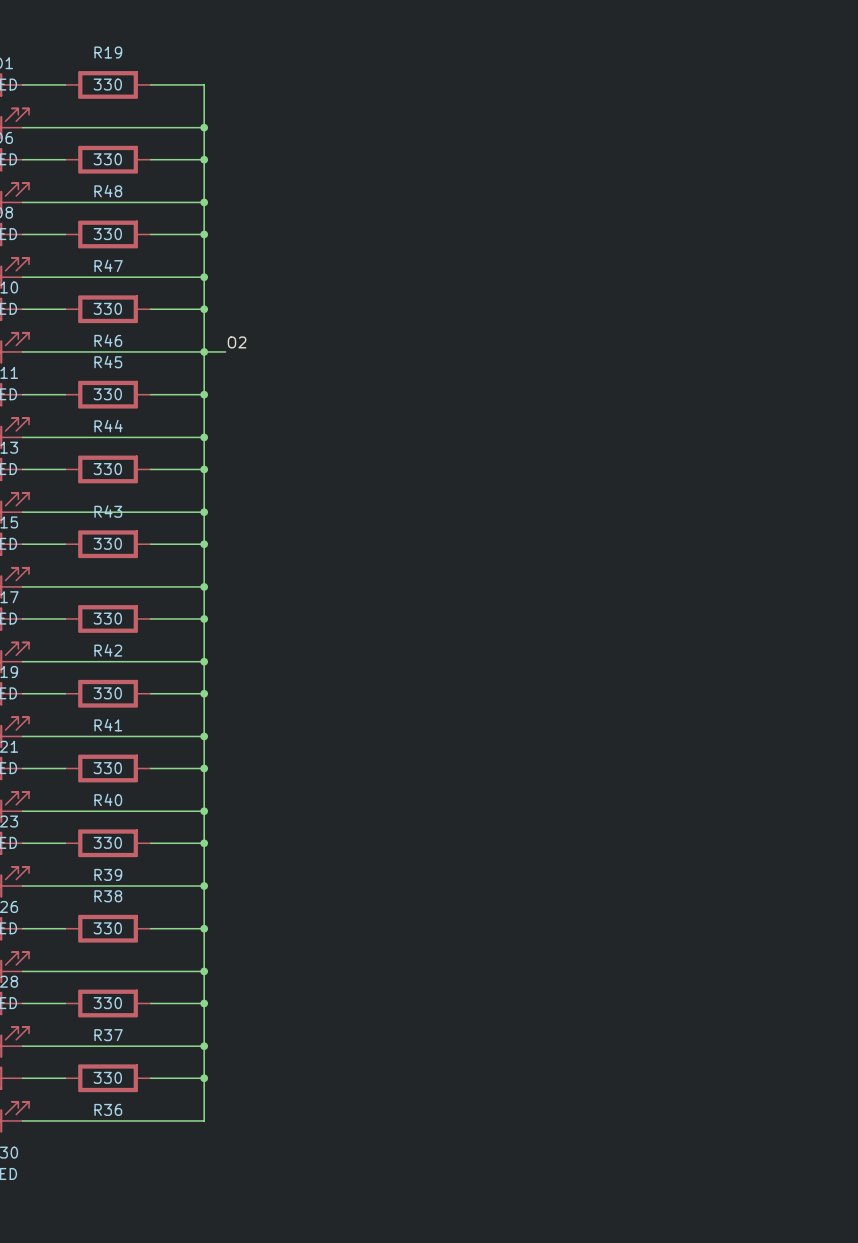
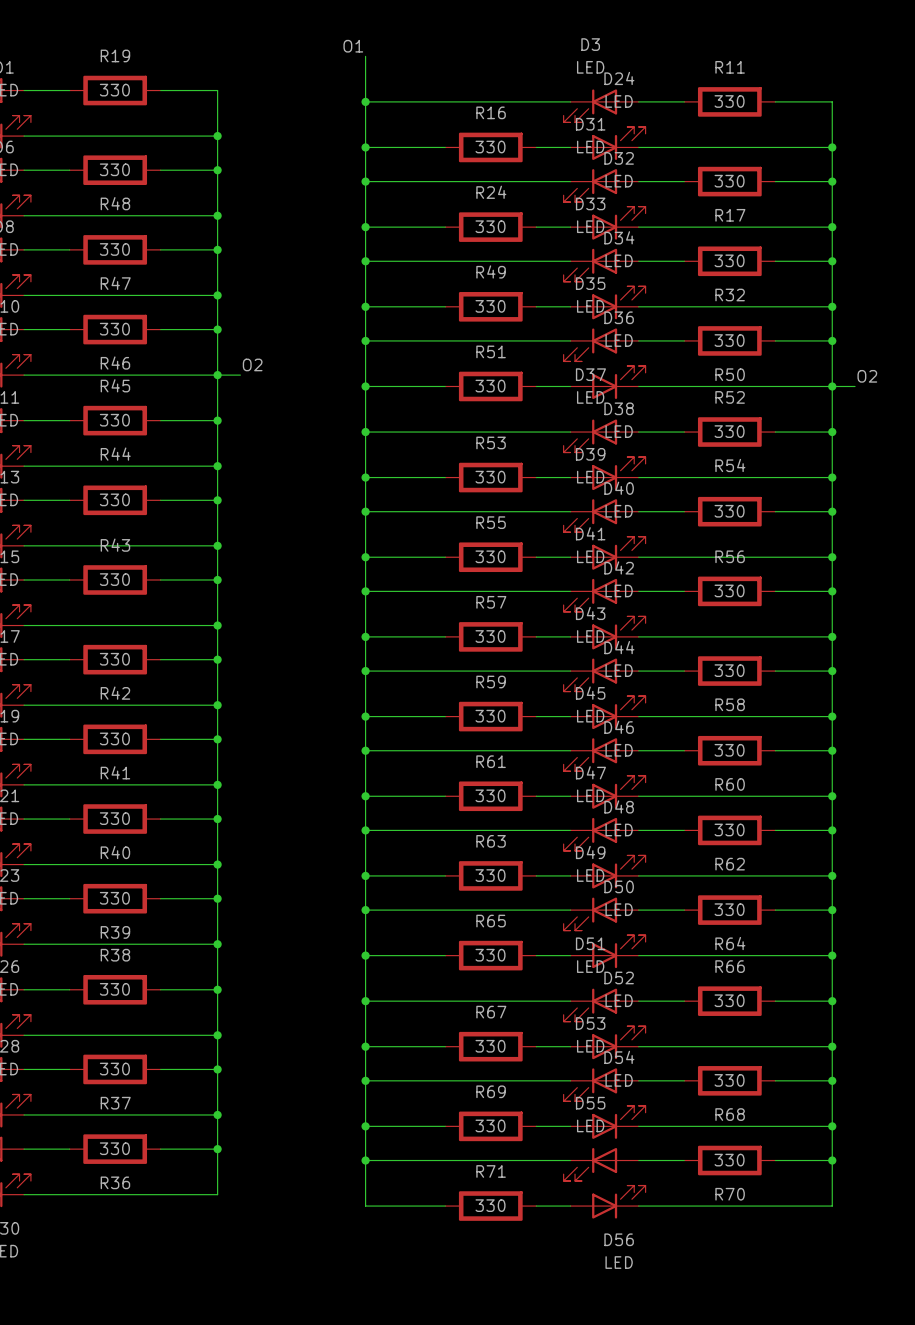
label: none -> O1 (353, 46)
wire: none -> (365, 56) (365, 1206) (445, 1206)
wire: none -> (365, 101) (570, 101)
junction: none -> (365, 101)
wire: none -> (638, 101) (684, 101)
R11: none -> 330 (729, 101)
wire: none -> (775, 101) (832, 101) (832, 1206) (638, 1206)
D3: none -> LED (601, 105)
D24: none -> LED (608, 143)
wire: none -> (365, 147) (445, 147)
junction: none -> (365, 147)
R16: none -> 330 (490, 147)
wire: none -> (536, 147) (570, 147)
wire: none -> (638, 147) (832, 147)
junction: none -> (832, 147)
wire: none -> (365, 181) (570, 181)
junction: none -> (365, 181)
wire: none -> (638, 181) (684, 181)
R17: none -> 330 (729, 181)
wire: none -> (775, 181) (832, 181)
junction: none -> (832, 181)
D31: none -> LED (601, 185)
D32: none -> LED (608, 223)
wire: none -> (365, 227) (445, 227)
junction: none -> (365, 227)
R24: none -> 330 (490, 227)
wire: none -> (536, 227) (570, 227)
wire: none -> (638, 227) (832, 227)
junction: none -> (832, 227)
wire: none -> (365, 261) (570, 261)
junction: none -> (365, 261)
wire: none -> (638, 261) (684, 261)
R32: none -> 330 (729, 261)
wire: none -> (775, 261) (832, 261)
junction: none -> (832, 261)
D33: none -> LED (601, 265)
D34: none -> LED (608, 302)
wire: none -> (365, 306) (445, 306)
junction: none -> (365, 306)
R49: none -> 330 (490, 306)
wire: none -> (536, 306) (570, 306)
wire: none -> (638, 306) (832, 306)
junction: none -> (832, 306)
wire: none -> (365, 340) (570, 340)
junction: none -> (365, 340)
wire: none -> (638, 340) (684, 340)
R50: none -> 330 (729, 340)
wire: none -> (775, 340) (832, 340)
junction: none -> (832, 340)
D35: none -> LED (601, 344)
label: none -> O2 (867, 376)
D36: none -> LED (608, 382)
wire: none -> (365, 386) (445, 386)
junction: none -> (365, 386)
R51: none -> 330 (490, 386)
wire: none -> (536, 386) (570, 386)
wire: none -> (638, 386) (855, 386)
junction: none -> (832, 386)
wire: none -> (365, 432) (570, 432)
junction: none -> (365, 432)
wire: none -> (638, 432) (684, 432)
R52: none -> 330 (729, 432)
wire: none -> (775, 432) (832, 432)
junction: none -> (832, 432)
D37: none -> LED (601, 436)
D38: none -> LED (608, 473)
wire: none -> (365, 477) (445, 477)
junction: none -> (365, 477)
R53: none -> 330 (490, 477)
wire: none -> (536, 477) (570, 477)
wire: none -> (638, 477) (832, 477)
junction: none -> (832, 477)
wire: none -> (365, 511) (570, 511)
junction: none -> (365, 511)
wire: none -> (638, 511) (684, 511)
R54: none -> 330 (729, 511)
wire: none -> (775, 511) (832, 511)
junction: none -> (832, 511)
D39: none -> LED (601, 515)
D40: none -> LED (608, 553)
wire: none -> (365, 557) (445, 557)
junction: none -> (365, 557)
R55: none -> 330 (490, 557)
wire: none -> (536, 557) (570, 557)
wire: none -> (638, 557) (832, 557)
junction: none -> (832, 557)
wire: none -> (365, 591) (570, 591)
junction: none -> (365, 591)
wire: none -> (638, 591) (684, 591)
R56: none -> 330 (729, 591)
wire: none -> (775, 591) (832, 591)
junction: none -> (832, 591)
D41: none -> LED (601, 595)
D42: none -> LED (608, 632)
wire: none -> (365, 636) (445, 636)
junction: none -> (365, 636)
R57: none -> 330 (490, 636)
wire: none -> (536, 636) (570, 636)
wire: none -> (638, 636) (832, 636)
junction: none -> (832, 636)
wire: none -> (365, 671) (570, 671)
junction: none -> (365, 671)
wire: none -> (638, 671) (684, 671)
R58: none -> 330 (729, 671)
wire: none -> (775, 671) (832, 671)
junction: none -> (832, 671)
D43: none -> LED (601, 675)
D44: none -> LED (608, 712)
wire: none -> (365, 716) (445, 716)
junction: none -> (365, 716)
R59: none -> 330 (490, 716)
wire: none -> (536, 716) (570, 716)
wire: none -> (638, 716) (832, 716)
junction: none -> (832, 716)
wire: none -> (365, 750) (570, 750)
junction: none -> (365, 750)
wire: none -> (638, 750) (684, 750)
R60: none -> 330 (729, 750)
wire: none -> (775, 750) (832, 750)
junction: none -> (832, 750)
D45: none -> LED (601, 754)
D46: none -> LED (608, 792)
wire: none -> (365, 796) (445, 796)
junction: none -> (365, 796)
R61: none -> 330 (490, 796)
wire: none -> (536, 796) (570, 796)
wire: none -> (638, 796) (832, 796)
junction: none -> (832, 796)
wire: none -> (365, 830) (570, 830)
junction: none -> (365, 830)
wire: none -> (638, 830) (684, 830)
R62: none -> 330 (729, 830)
wire: none -> (775, 830) (832, 830)
junction: none -> (832, 830)
D47: none -> LED (601, 834)
D48: none -> LED (608, 871)
wire: none -> (365, 875) (445, 875)
junction: none -> (365, 875)
R63: none -> 330 (490, 875)
wire: none -> (536, 875) (570, 875)
wire: none -> (638, 875) (832, 875)
junction: none -> (832, 875)
wire: none -> (365, 910) (570, 910)
junction: none -> (365, 910)
wire: none -> (638, 910) (684, 910)
R64: none -> 330 (729, 910)
wire: none -> (775, 910) (832, 910)
junction: none -> (832, 910)
D49: none -> LED (601, 914)
D50: none -> LED (608, 951)
wire: none -> (365, 955) (445, 955)
junction: none -> (365, 955)
R65: none -> 330 (490, 955)
wire: none -> (536, 955) (570, 955)
wire: none -> (638, 955) (832, 955)
junction: none -> (832, 955)
wire: none -> (365, 1001) (570, 1001)
junction: none -> (365, 1001)
wire: none -> (638, 1001) (684, 1001)
R66: none -> 330 (729, 1001)
wire: none -> (775, 1001) (832, 1001)
junction: none -> (832, 1001)
D51: none -> LED (601, 1005)
D52: none -> LED (608, 1042)
wire: none -> (365, 1046) (445, 1046)
junction: none -> (365, 1046)
R67: none -> 330 (490, 1046)
wire: none -> (536, 1046) (570, 1046)
wire: none -> (638, 1046) (832, 1046)
junction: none -> (832, 1046)
wire: none -> (365, 1080) (570, 1080)
junction: none -> (365, 1080)
wire: none -> (638, 1080) (684, 1080)
R68: none -> 330 (729, 1080)
wire: none -> (775, 1080) (832, 1080)
junction: none -> (832, 1080)
D53: none -> LED (601, 1084)
D54: none -> LED (608, 1122)
wire: none -> (365, 1126) (445, 1126)
junction: none -> (365, 1126)
R69: none -> 330 (490, 1126)
wire: none -> (536, 1126) (570, 1126)
wire: none -> (638, 1126) (832, 1126)
junction: none -> (832, 1126)
wire: none -> (365, 1160) (570, 1160)
junction: none -> (365, 1160)
wire: none -> (638, 1160) (684, 1160)
R70: none -> 330 (729, 1160)
wire: none -> (775, 1160) (832, 1160)
junction: none -> (832, 1160)
D55: none -> LED (601, 1164)
D56: none -> LED (608, 1202)
R71: none -> 330 (490, 1206)
wire: none -> (536, 1206) (570, 1206)

